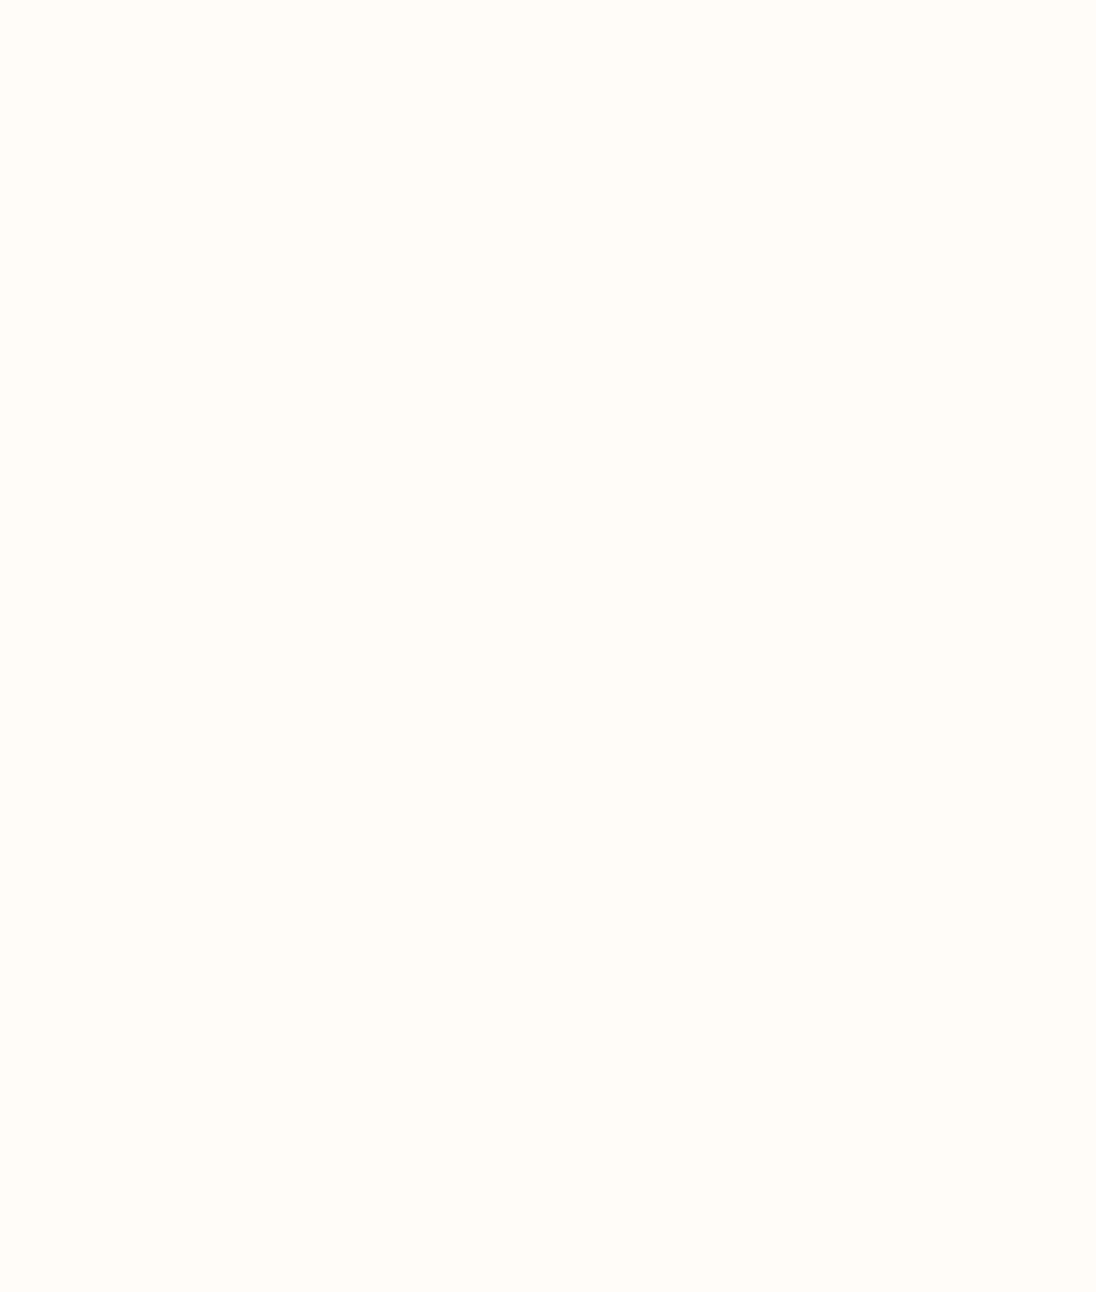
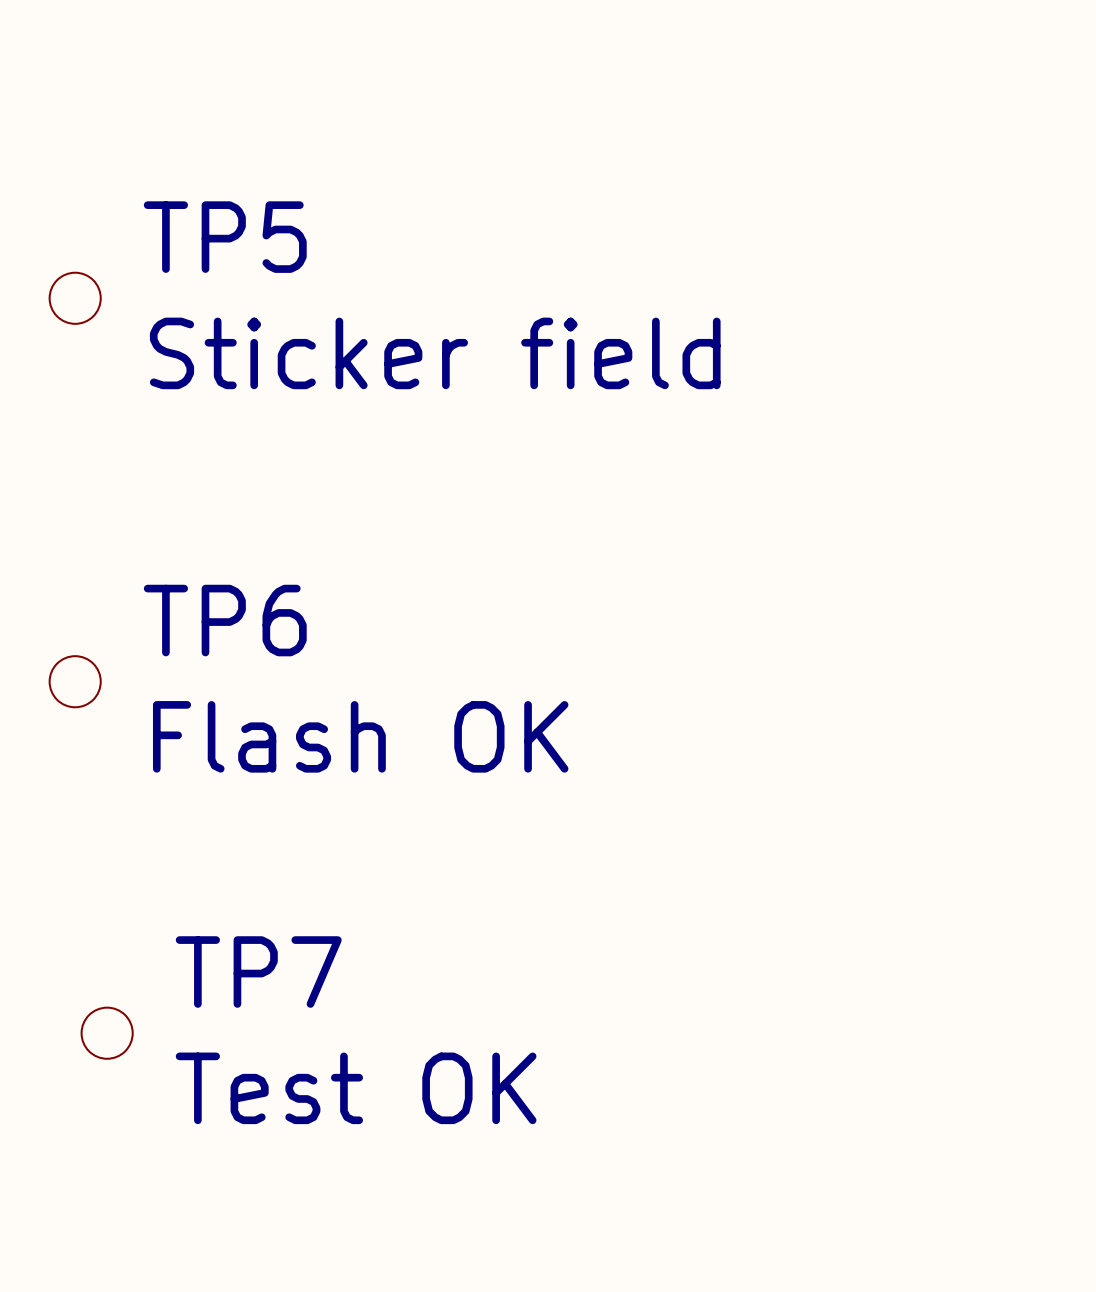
TP5: none -> Sticker field (75, 298)
TP6: none -> Flash OK (75, 681)
TP7: none -> Test OK (107, 1033)

